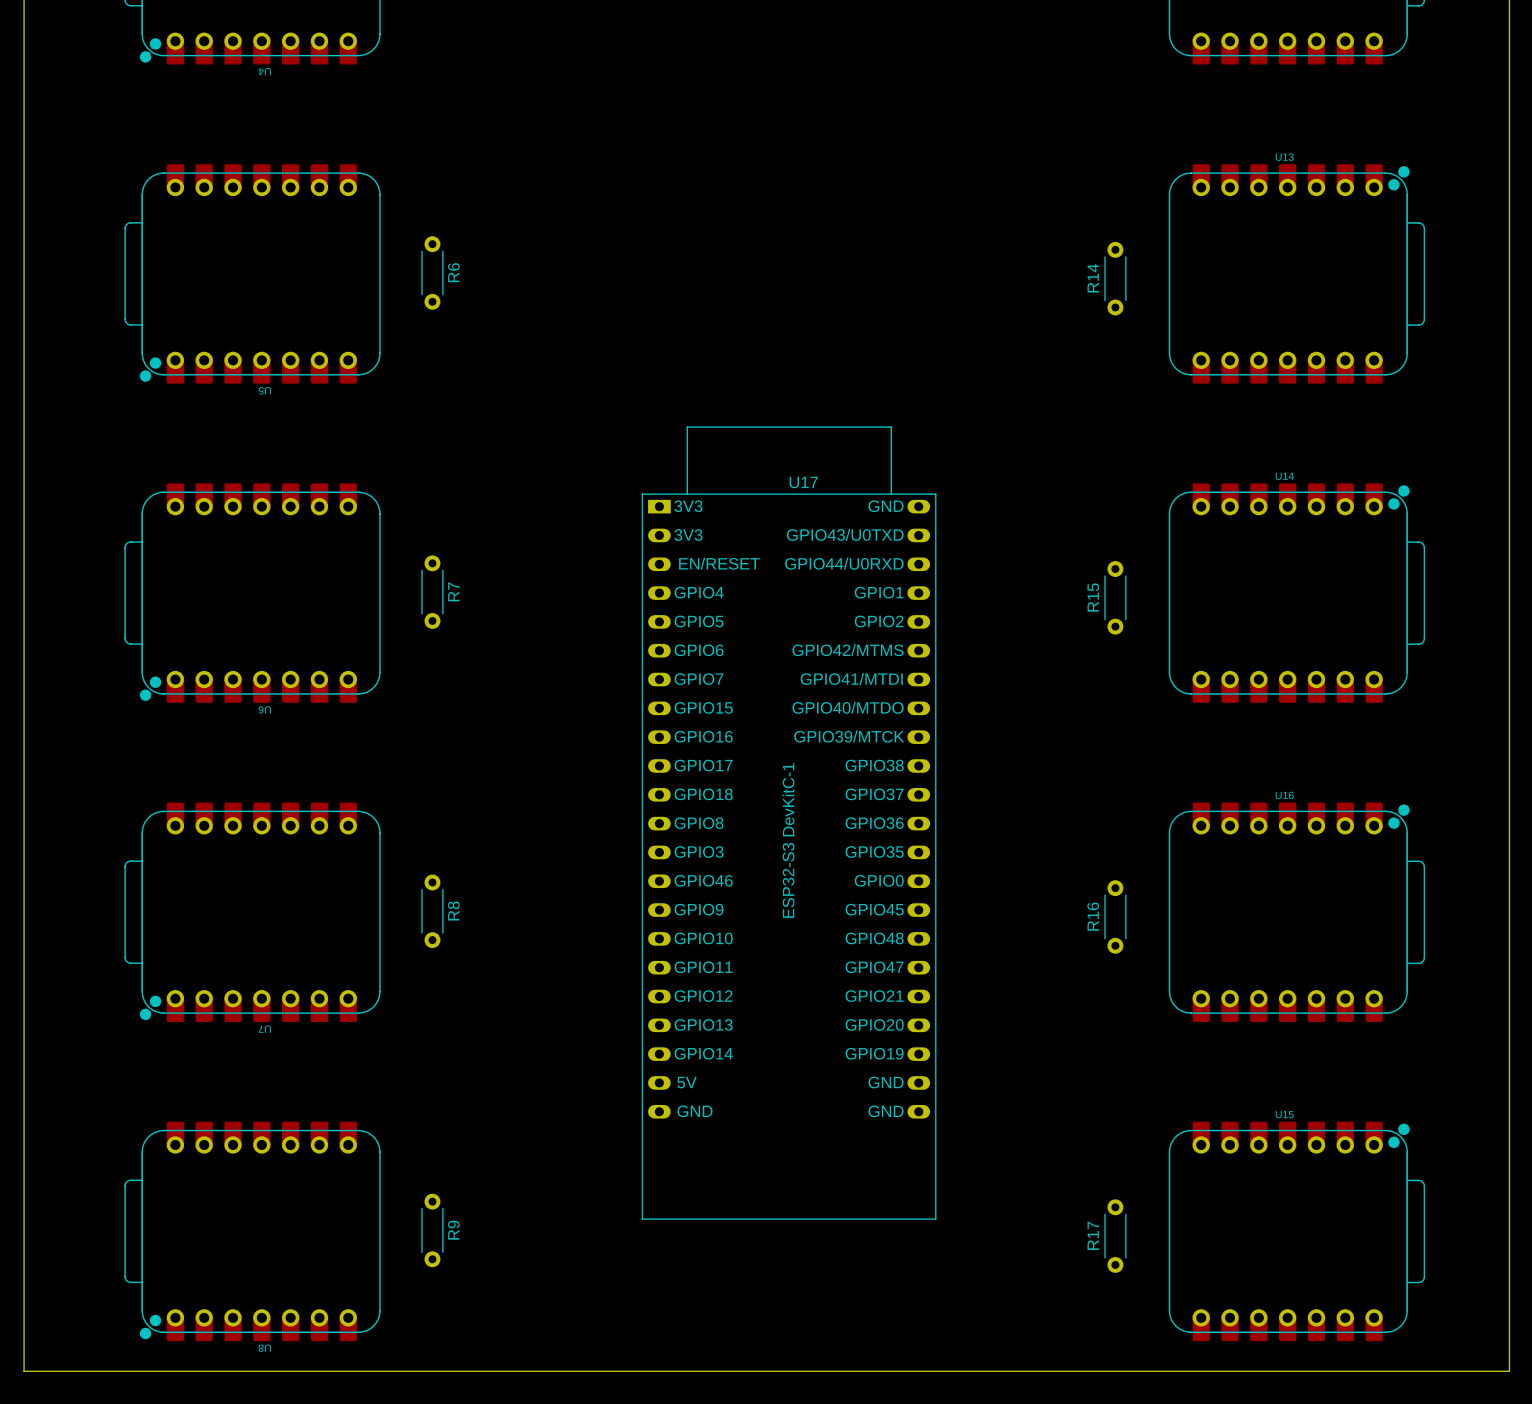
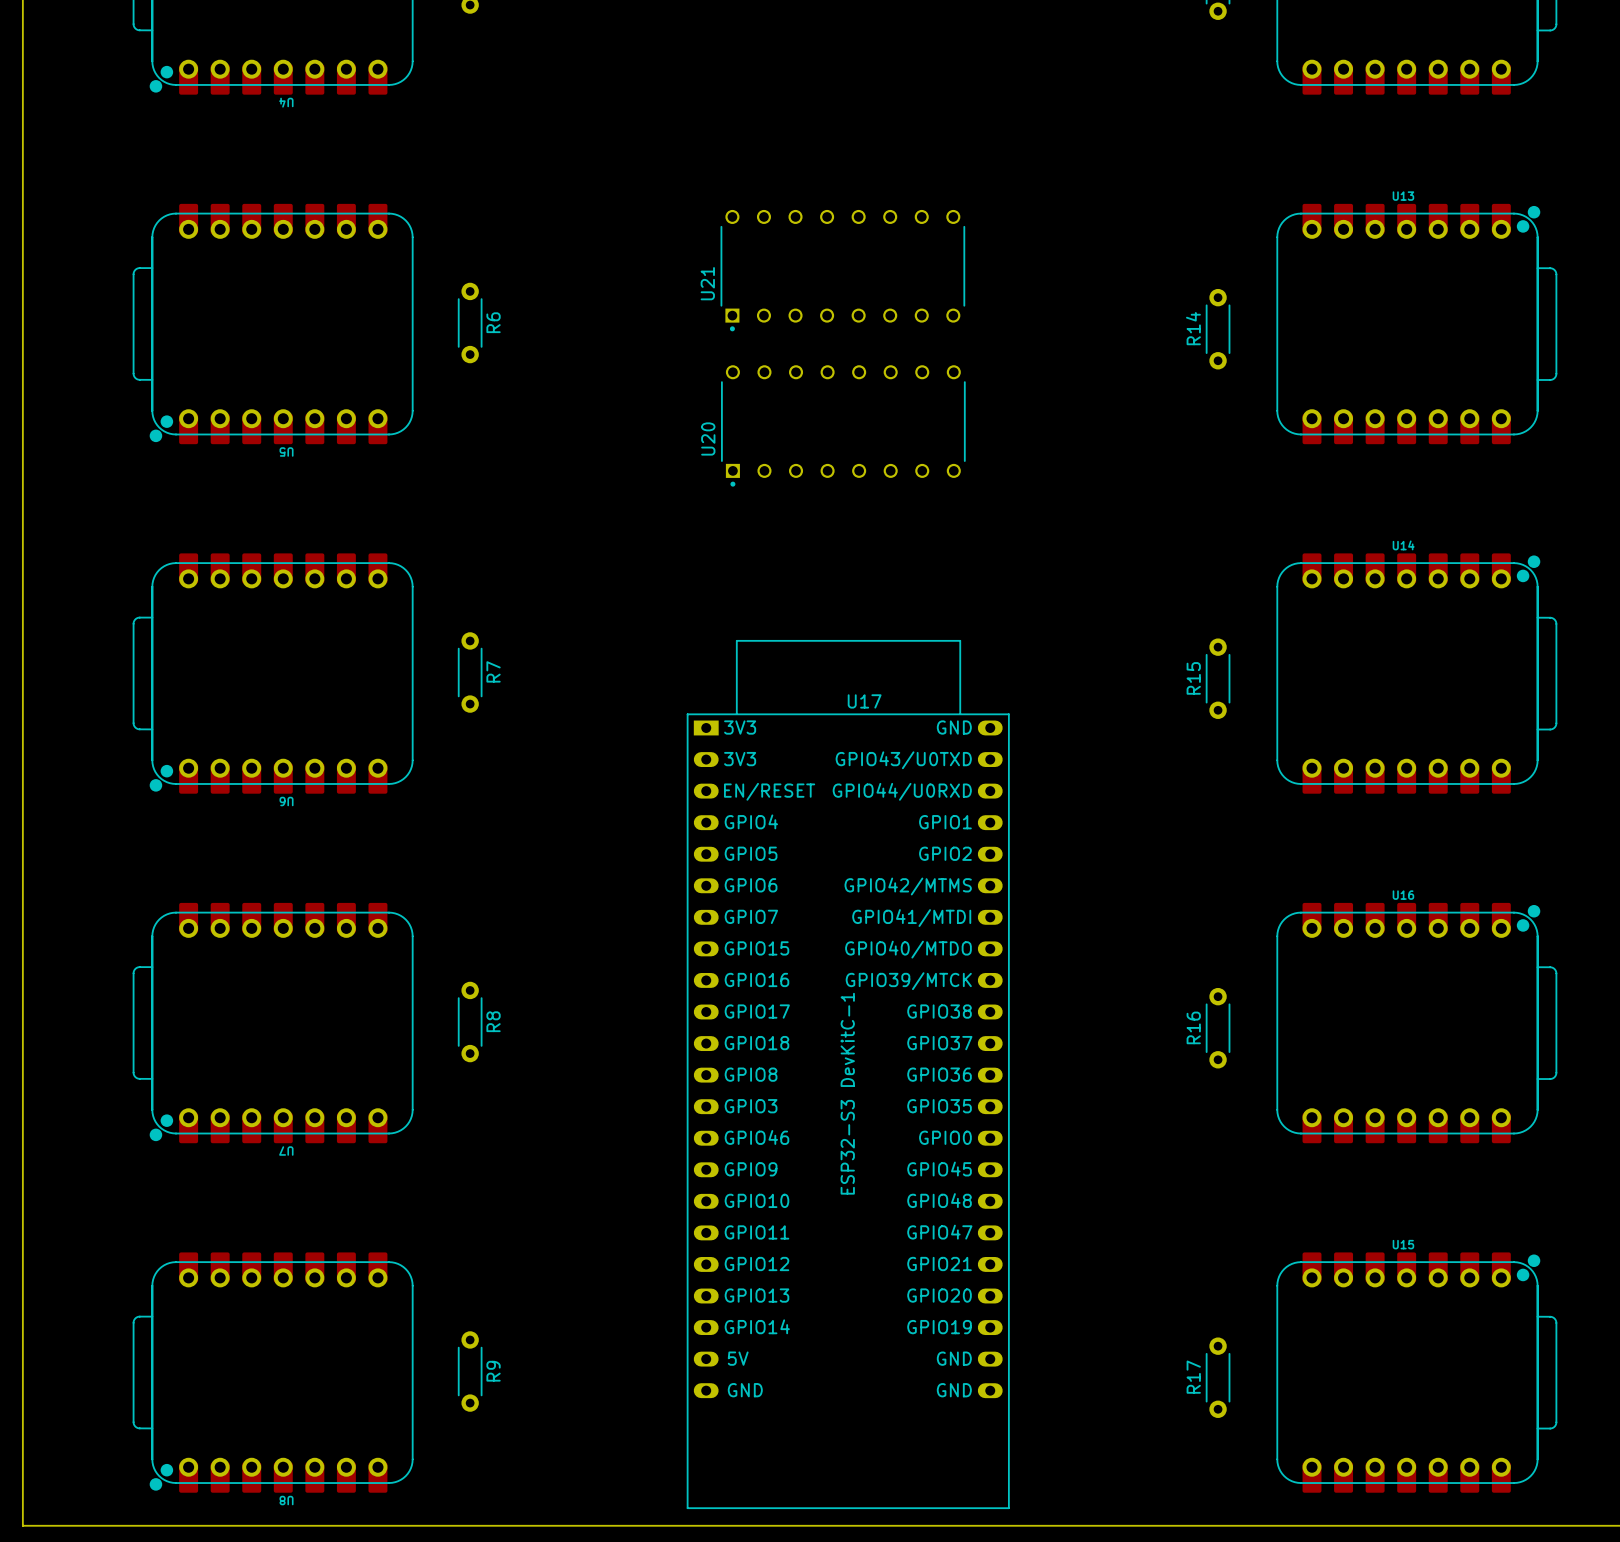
U21: none -> (842, 270)
U20: none -> (843, 425)
U17 position: (789, 823) -> (848, 1074)

